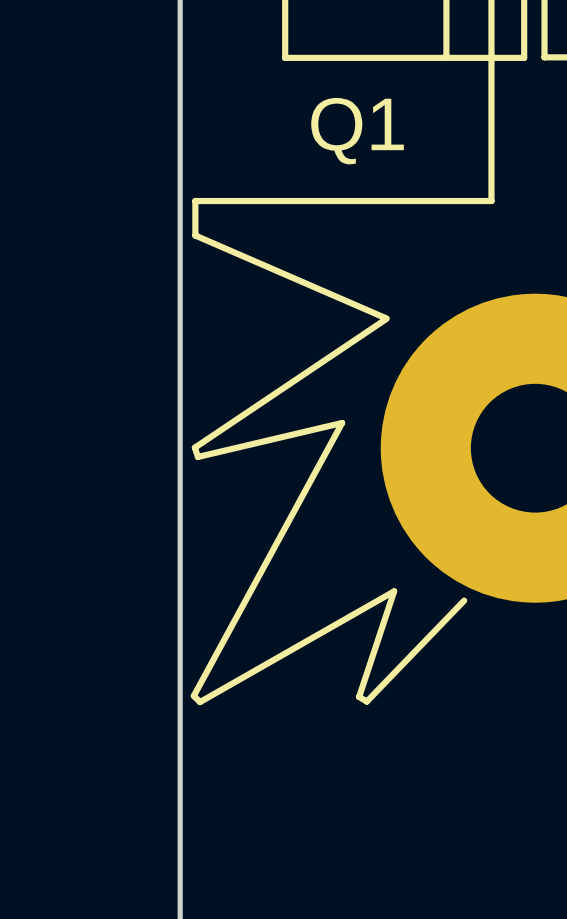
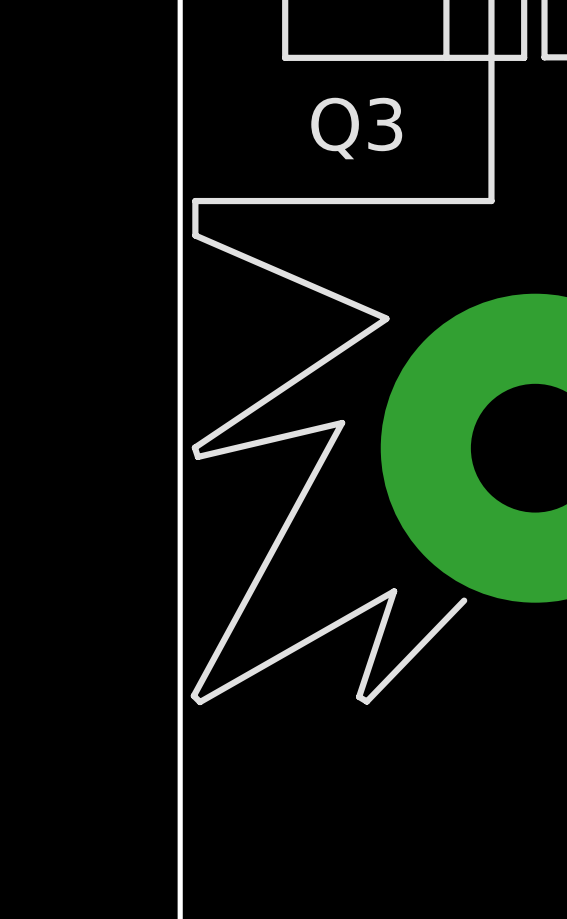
Q1 name: Q1 (357, 131) -> Q3 (356, 128)

